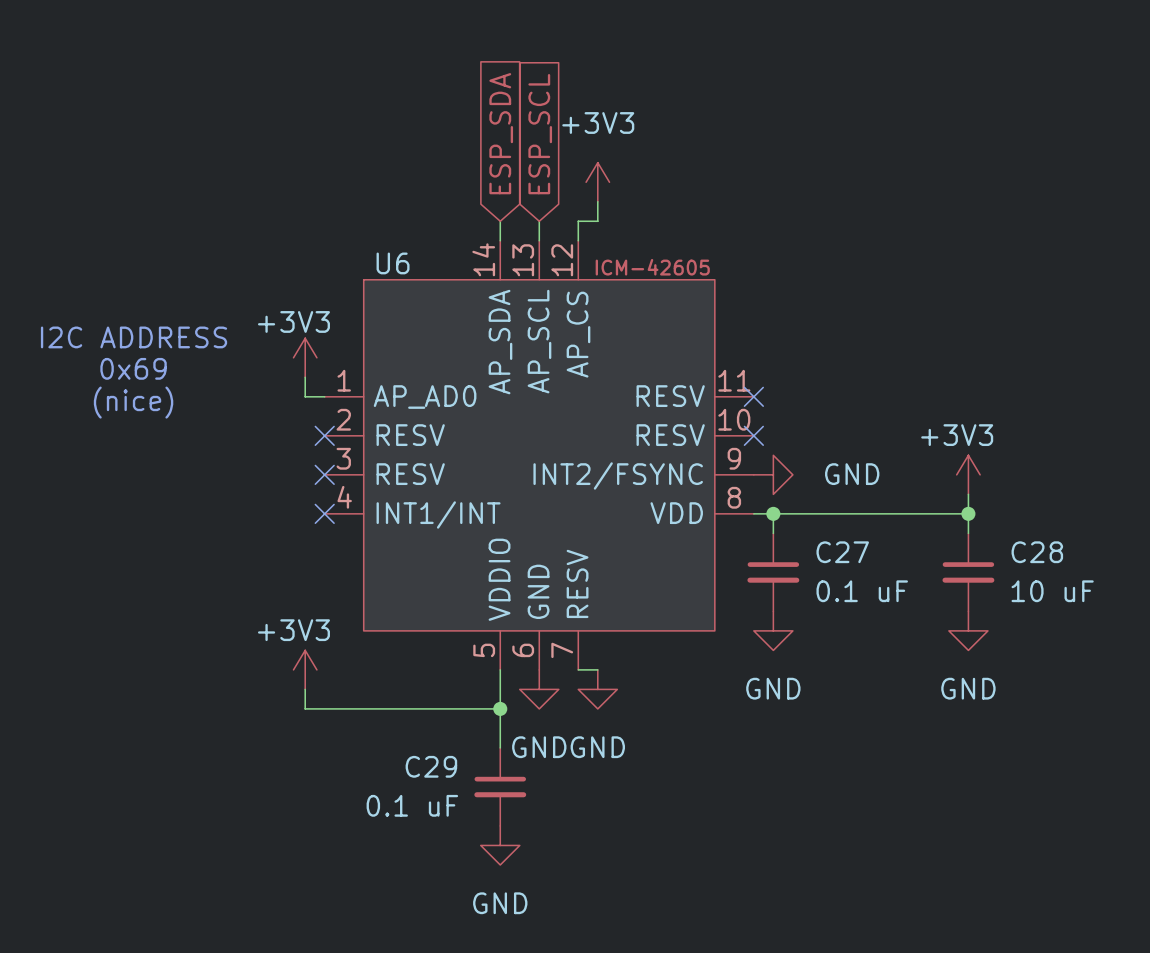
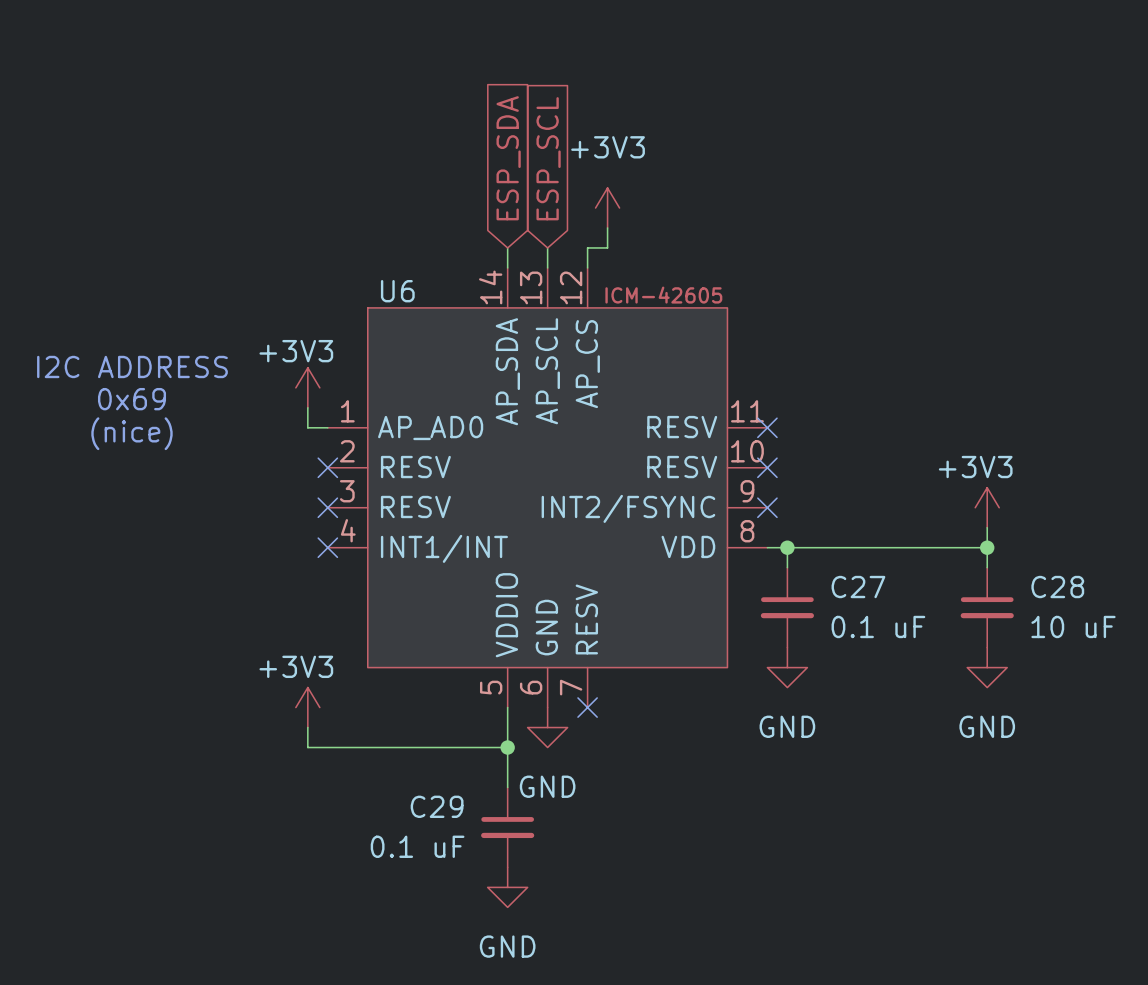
no-connect mark: none -> (767, 507)
power symbol: GND (773, 474) -> none
wire: (578, 669) (597, 669) -> none
no-connect mark: none -> (587, 707)
power symbol: GND (597, 689) -> none

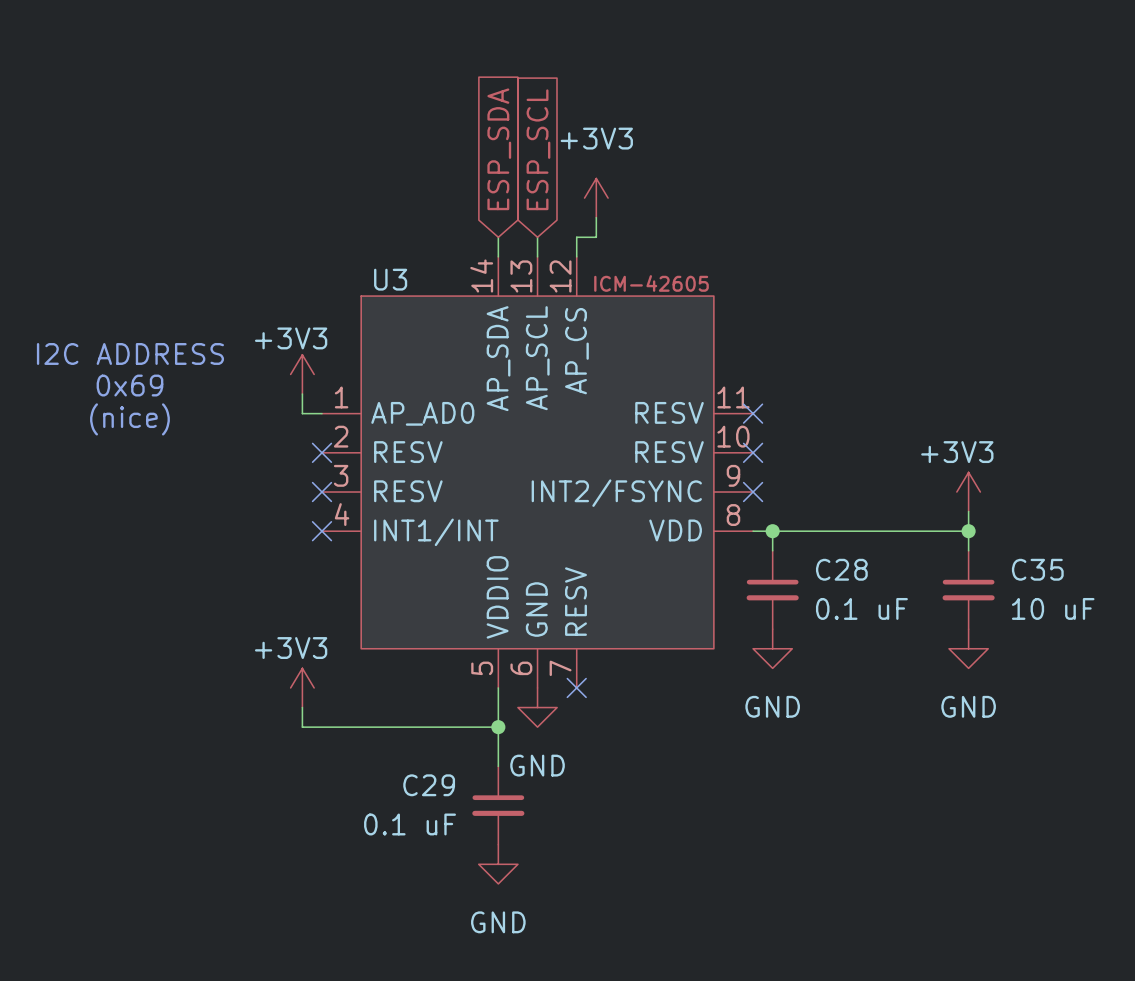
U6 name: U6 (397, 291) -> U3 (390, 279)
C27 name: C27 (858, 587) -> C28 (841, 569)
C28 name: C28 (1057, 587) -> C35 (1037, 569)

